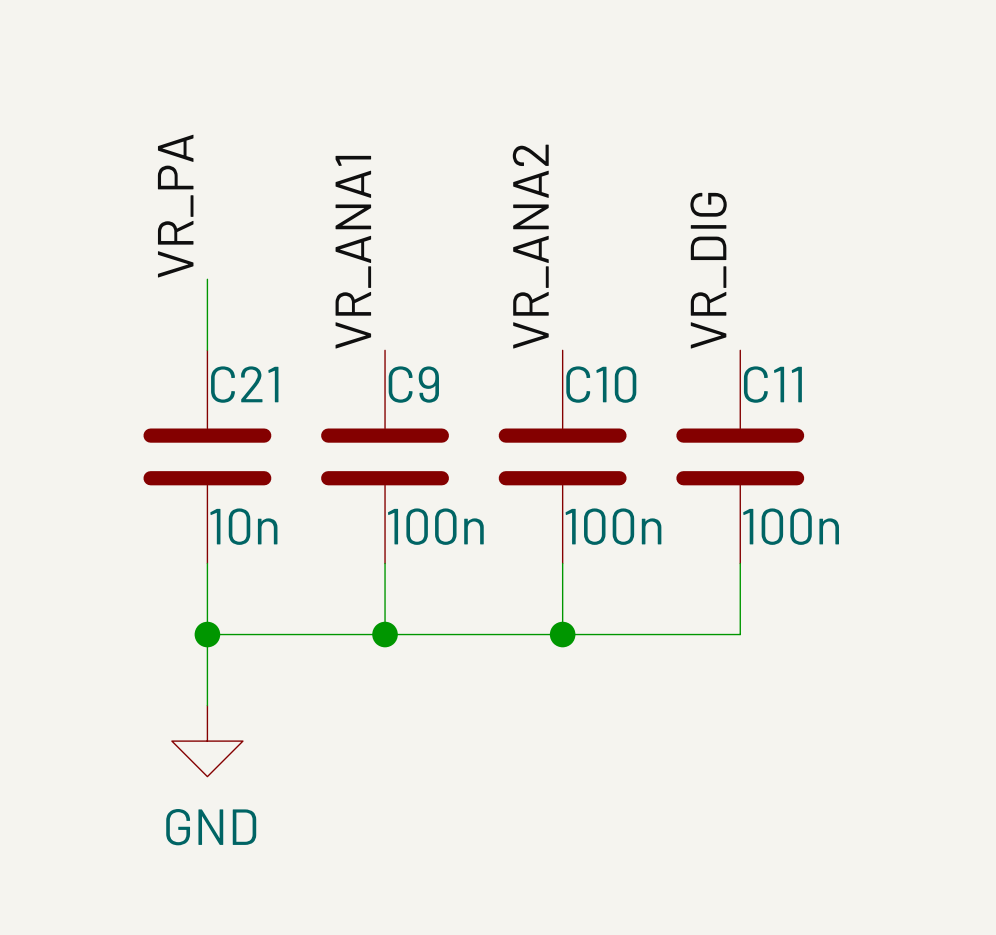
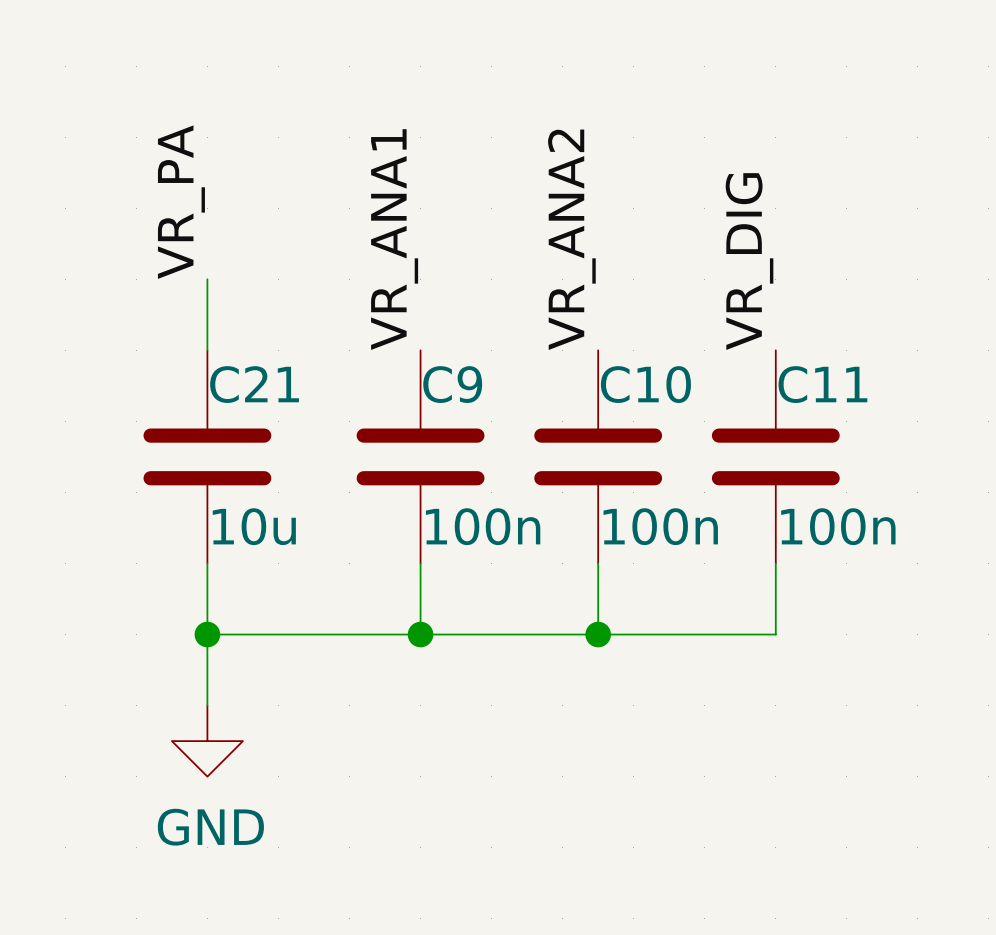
label position: VR_ANA2 (530, 246) -> VR_ANA2 (571, 239)
label position: VR_ANA1 (353, 252) -> VR_ANA1 (394, 239)
label position: VR_DIG (708, 270) -> VR_DIG (749, 261)
C9 position: (385, 456) -> (420, 456)
C10 position: (562, 456) -> (598, 456)
C11 position: (740, 456) -> (775, 456)
C21 value: 10n (243, 526) -> 10u (254, 526)
wire: (385, 563) (385, 634) -> (420, 563) (420, 634)
wire: (562, 563) (562, 634) -> (598, 563) (598, 634)
wire: (740, 563) (740, 634) -> (775, 563) (775, 634) (740, 634)
junction position: (385, 634) -> (420, 634)
junction position: (562, 634) -> (598, 634)

